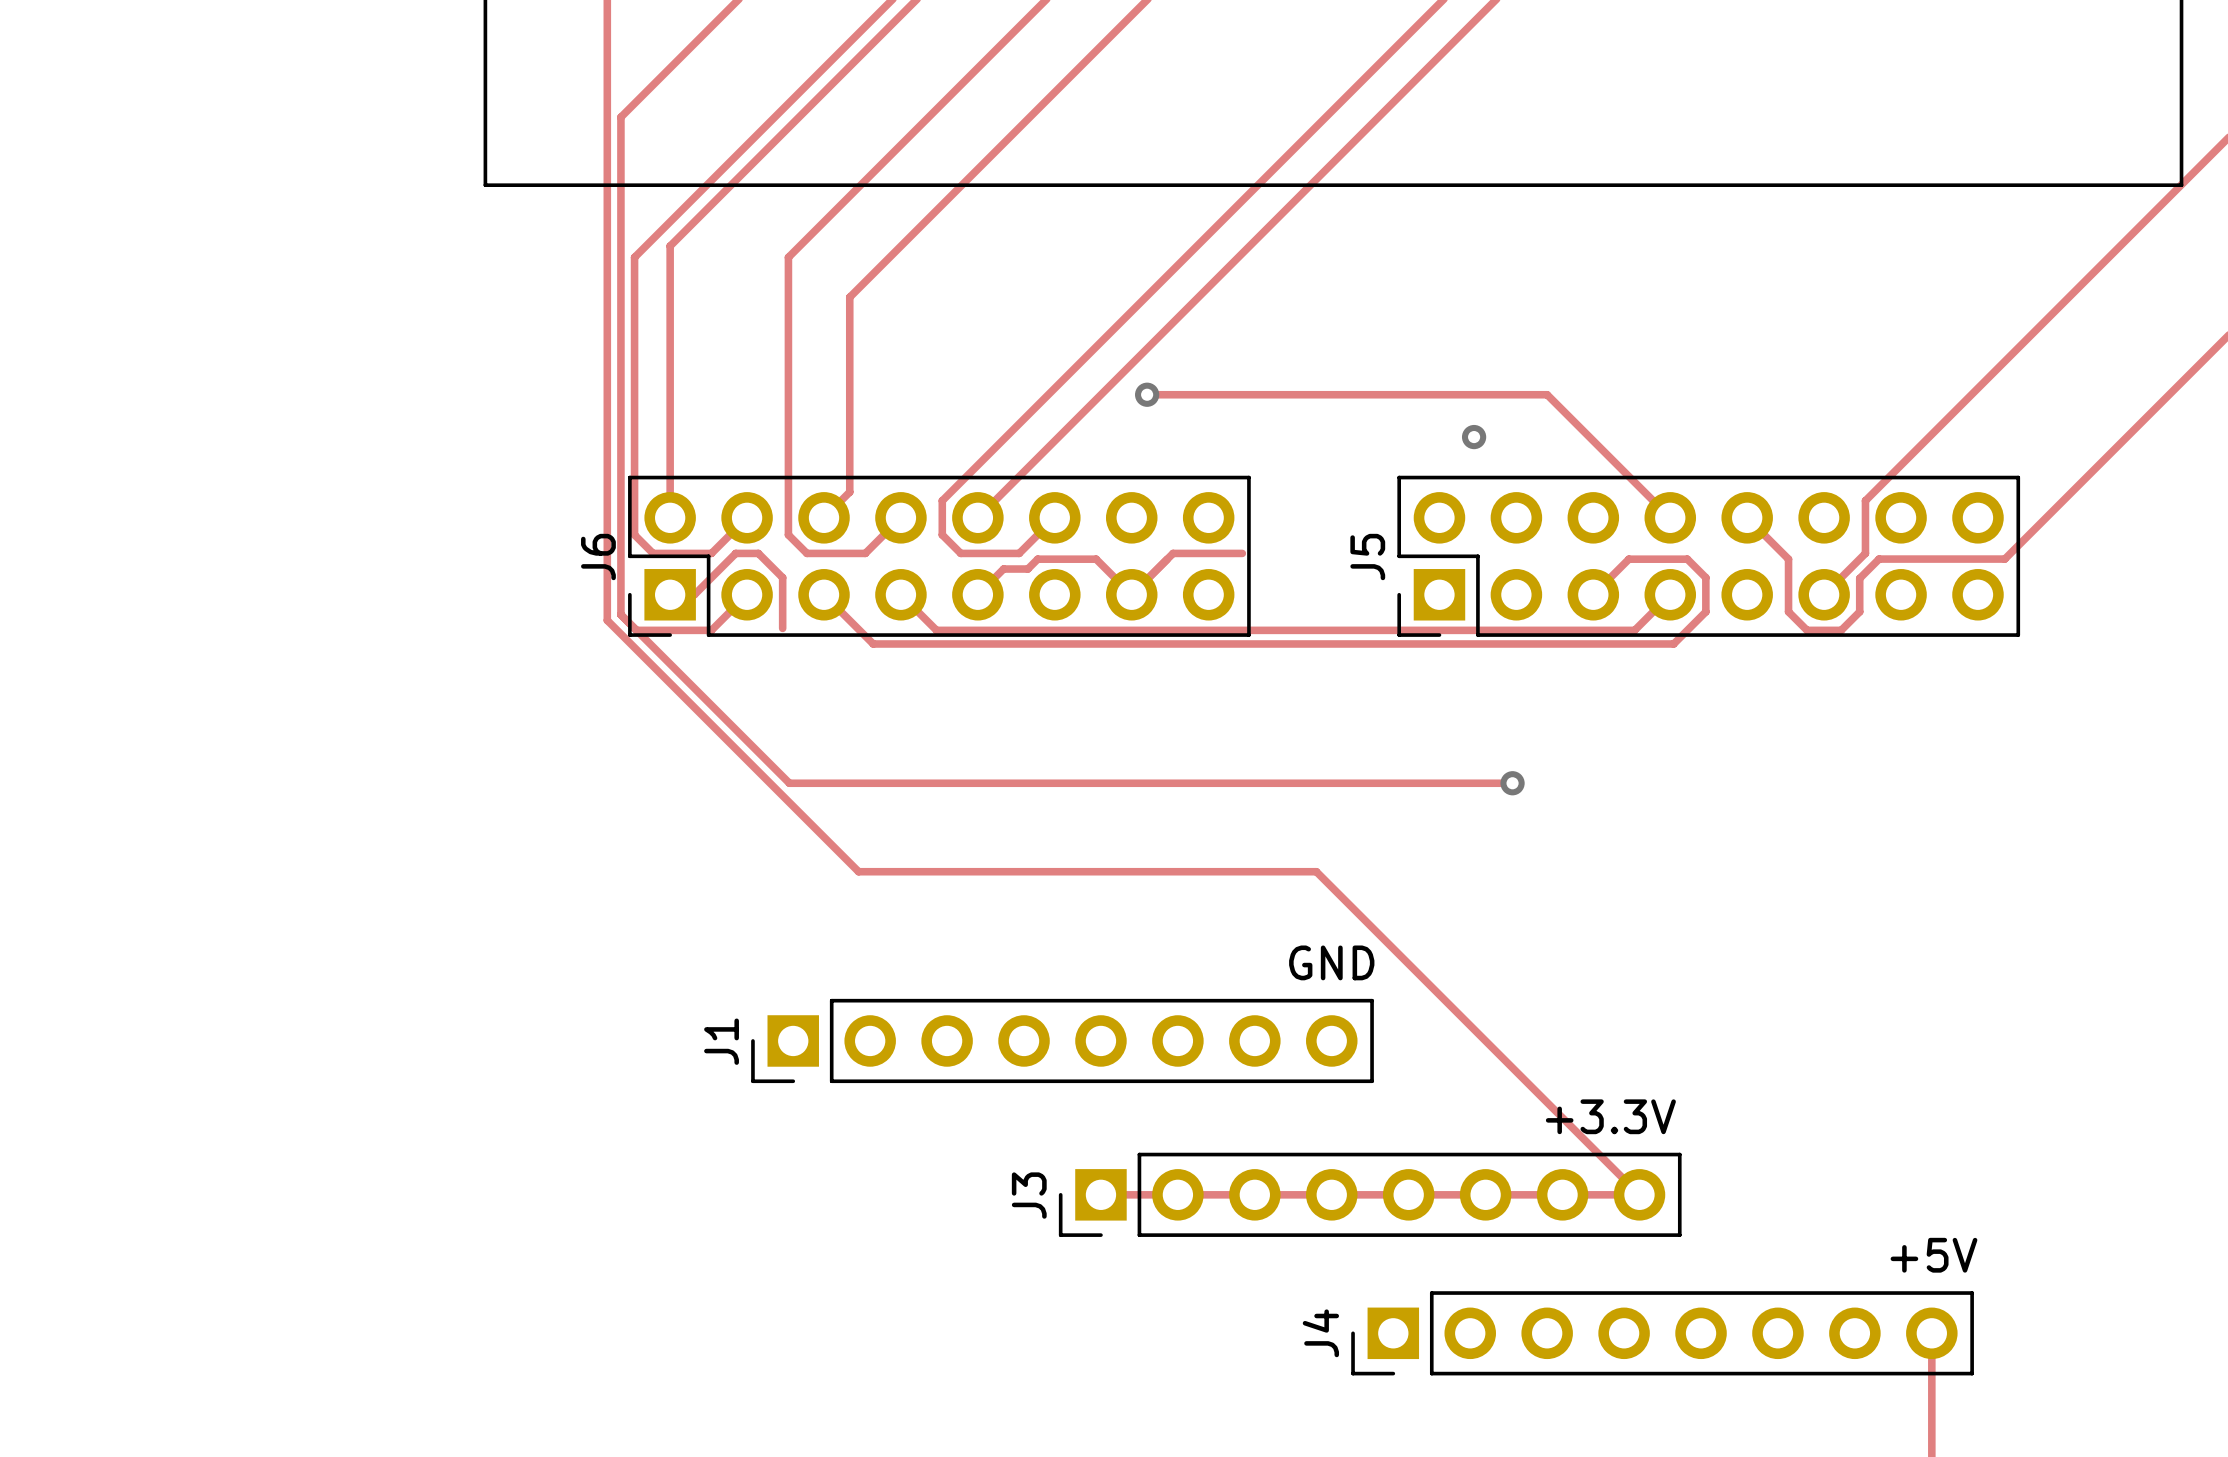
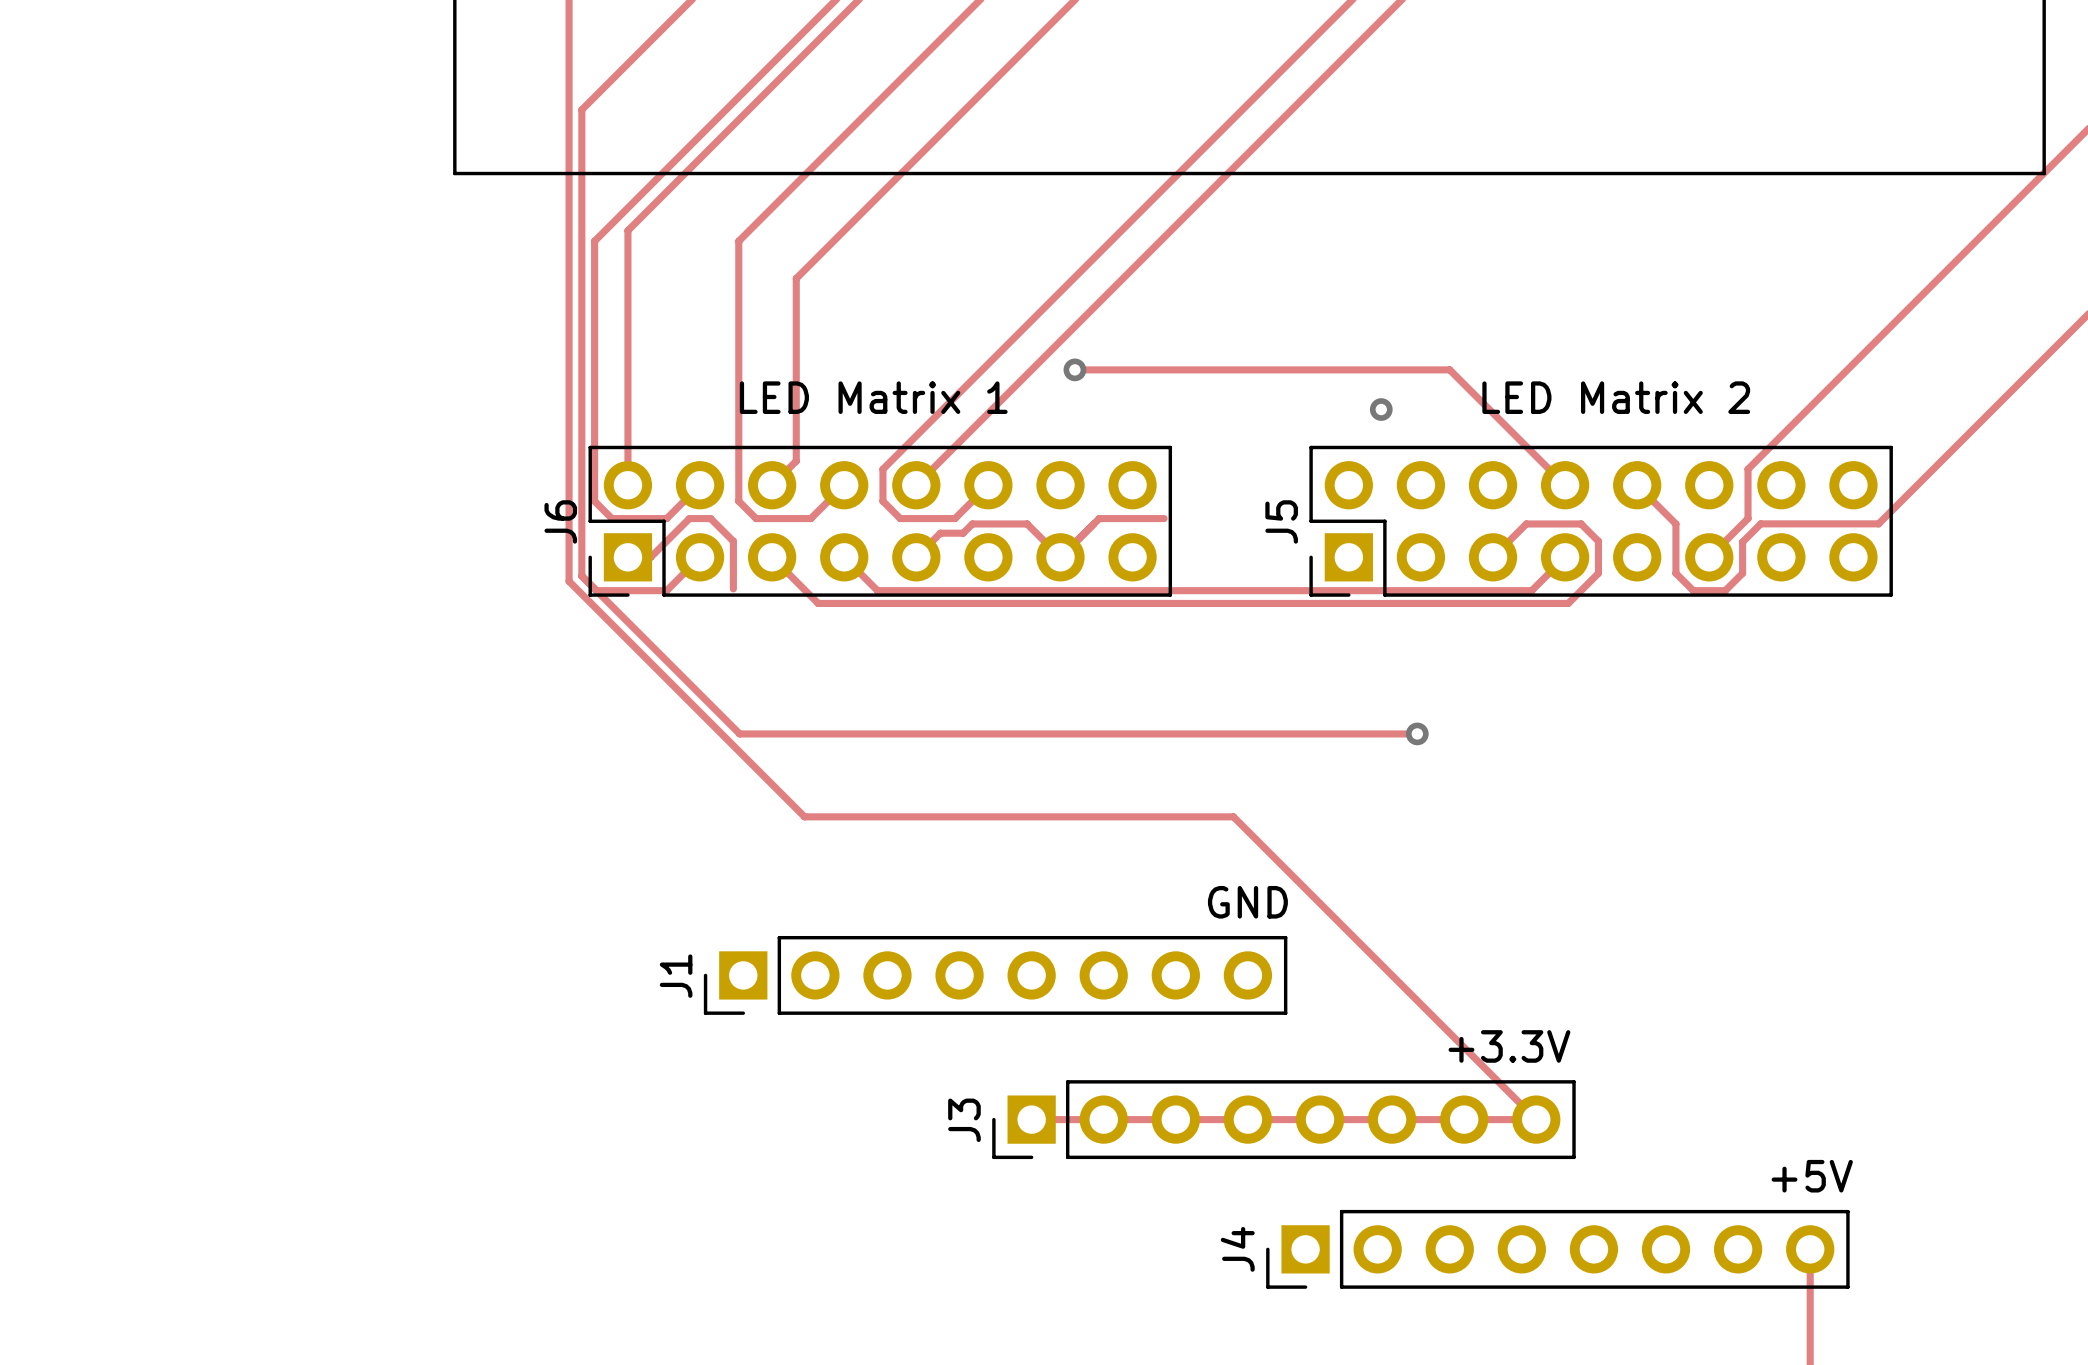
text: none -> LED Matrix 1 (873, 397)
text: none -> LED Matrix 2 (1616, 397)

